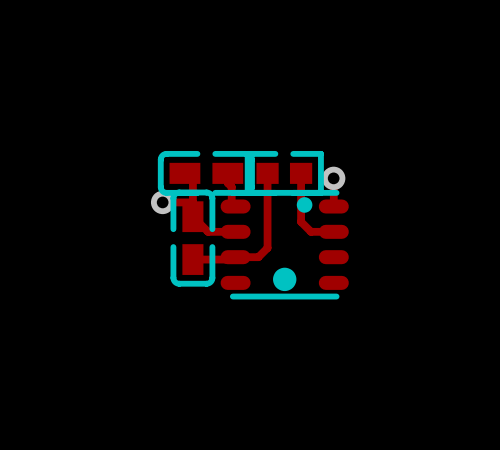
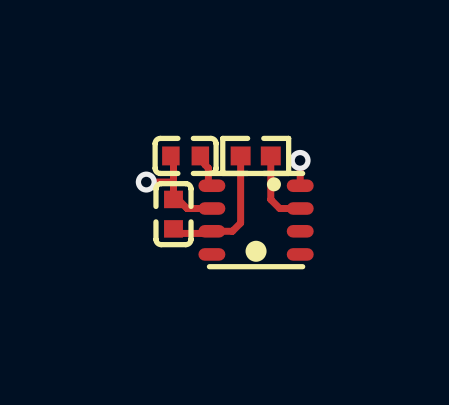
part footprint: [157, 150, 255, 196] -> [152, 135, 219, 177]
part footprint: [170, 189, 216, 287] -> [153, 181, 194, 248]

